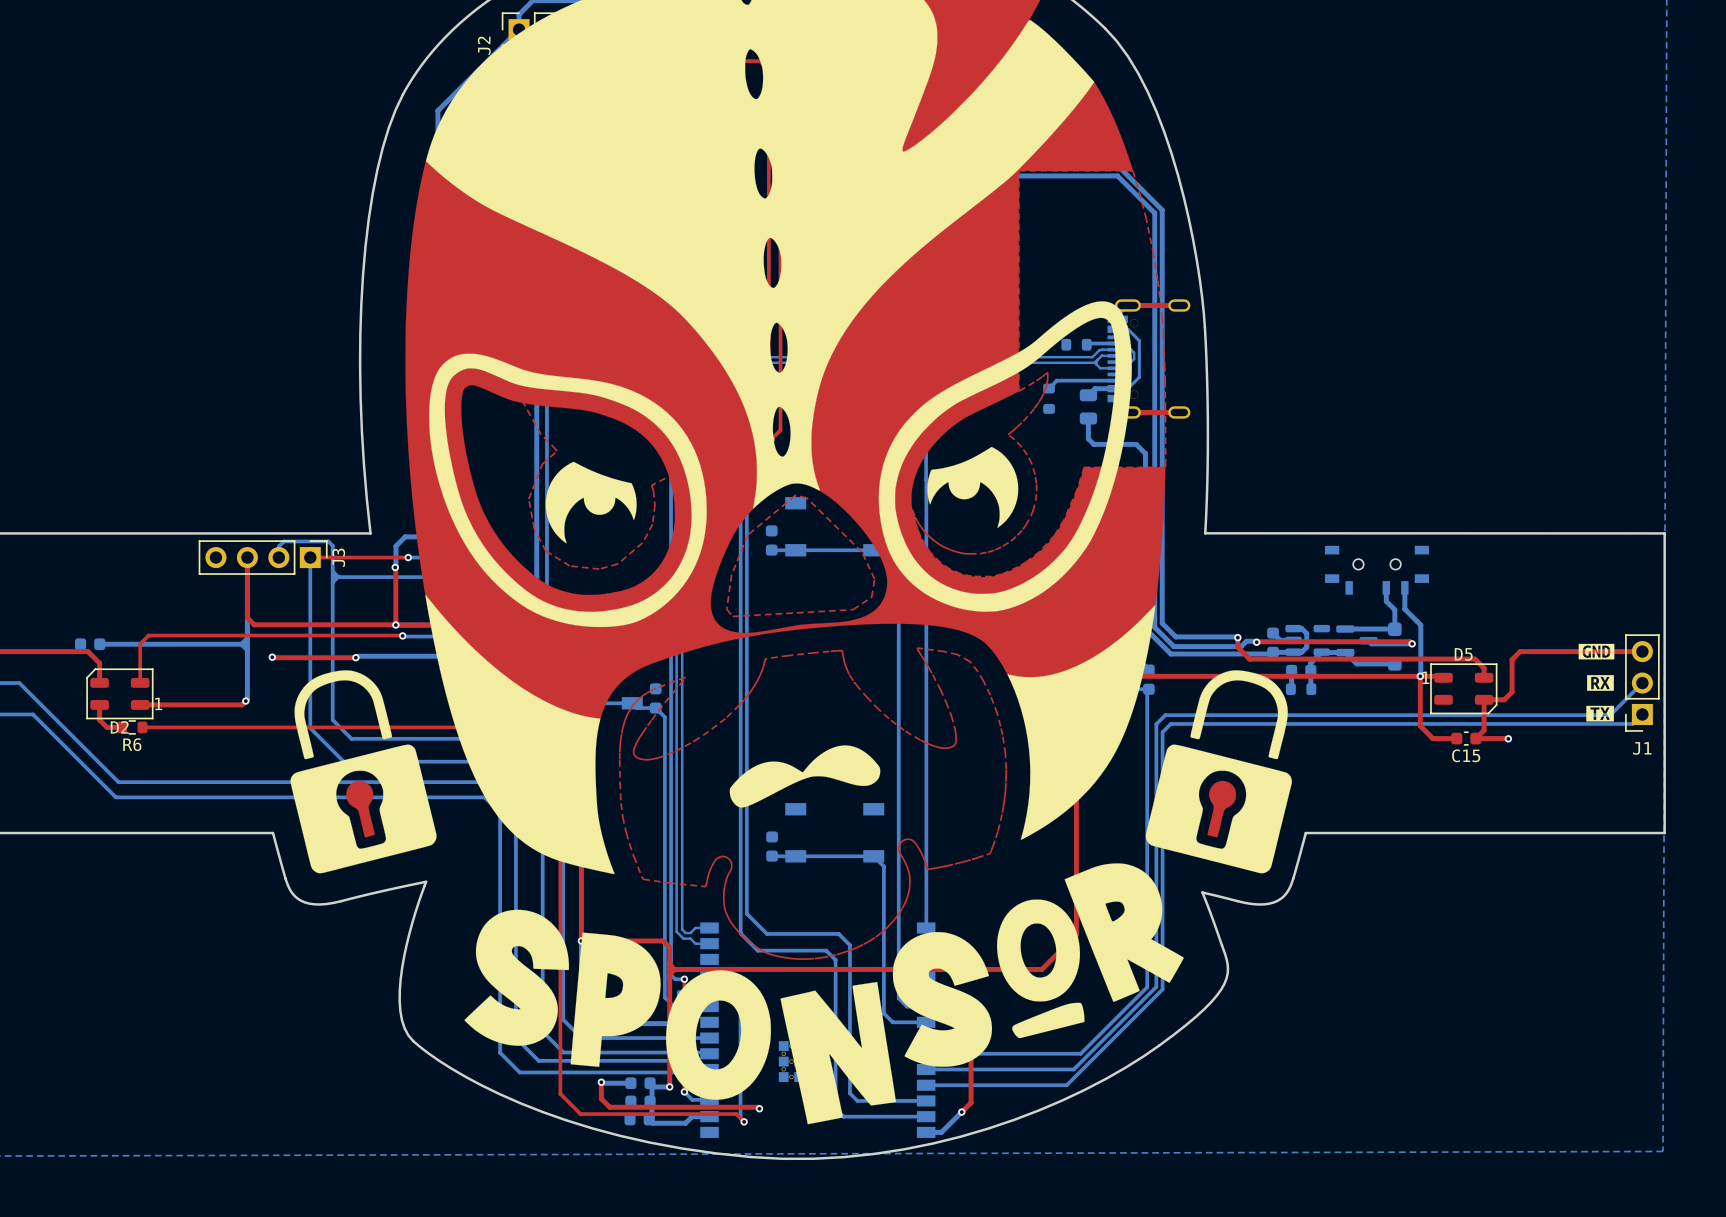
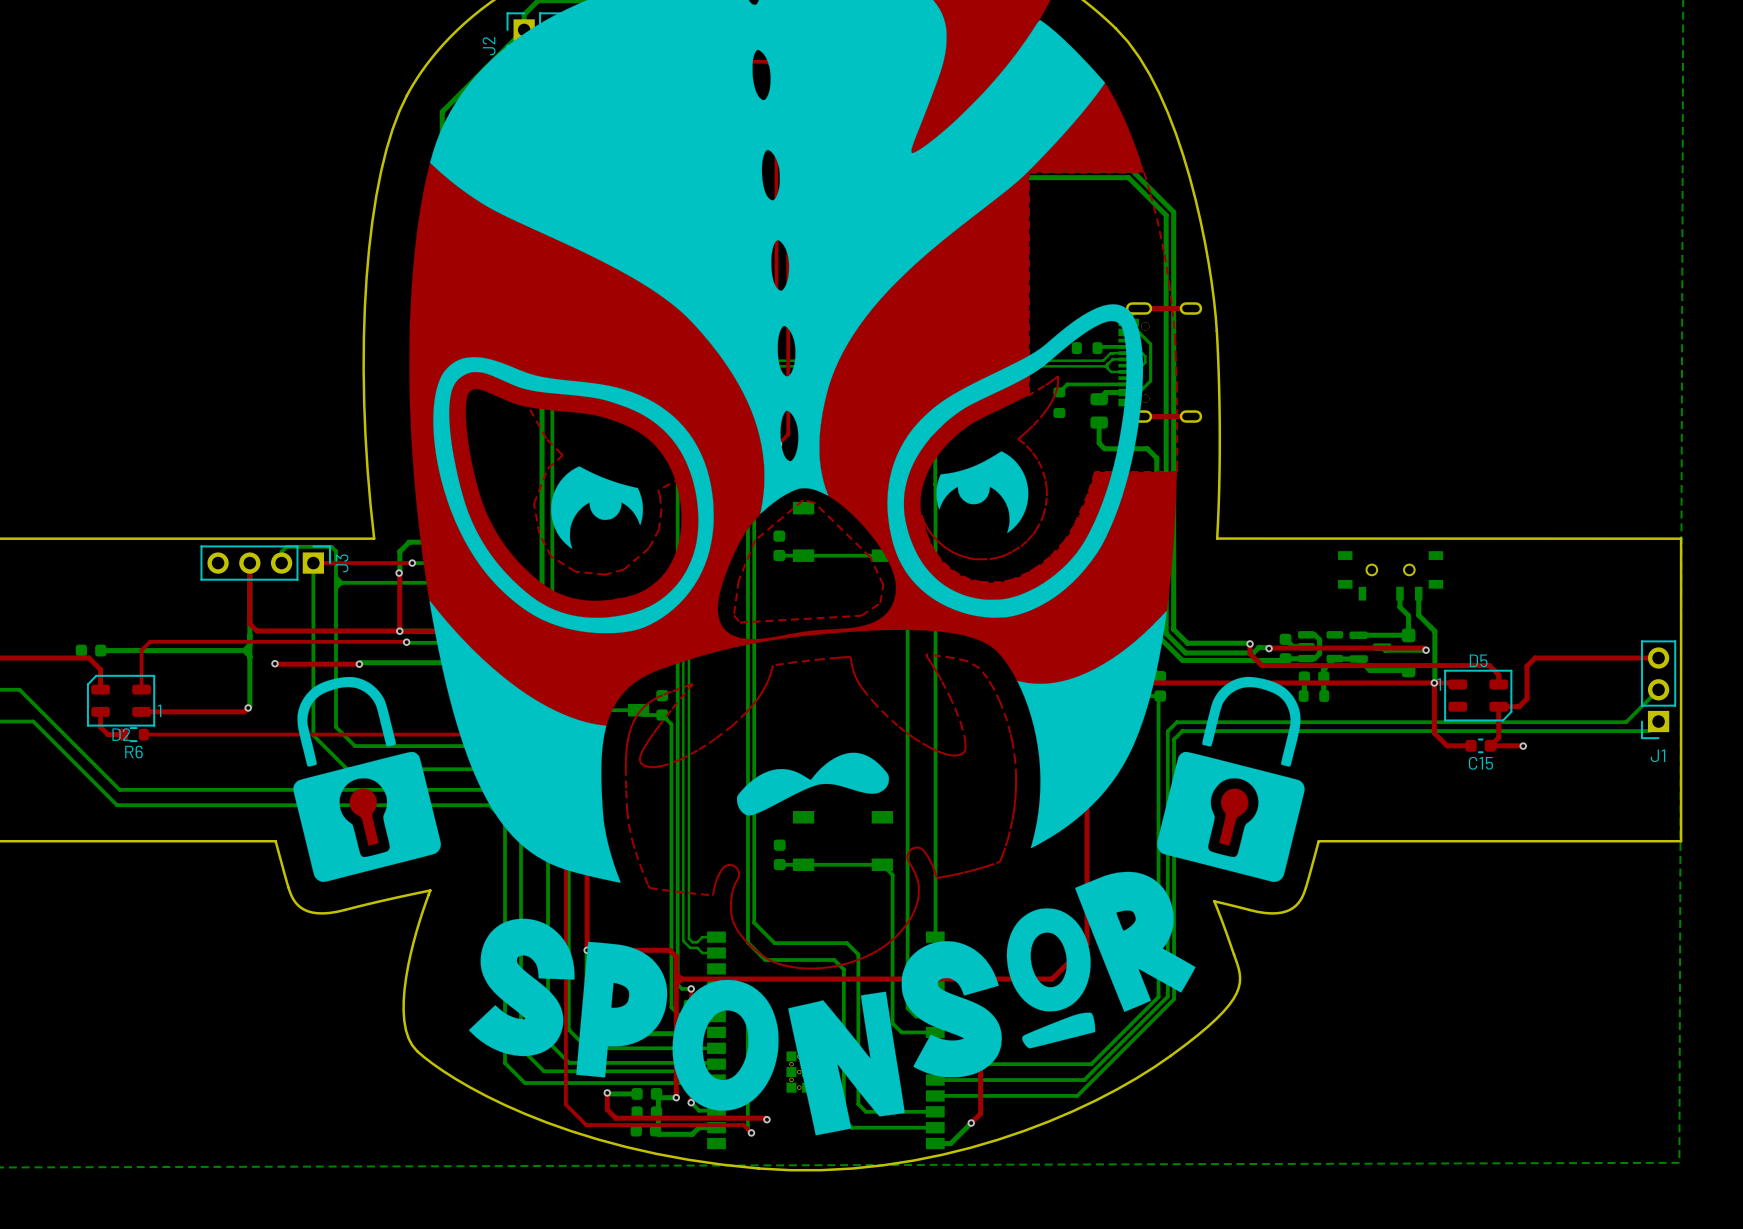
drawing: [1578, 643, 1615, 660] -> none
drawing: [1587, 675, 1614, 691] -> none
drawing: [1586, 705, 1614, 722] -> none

